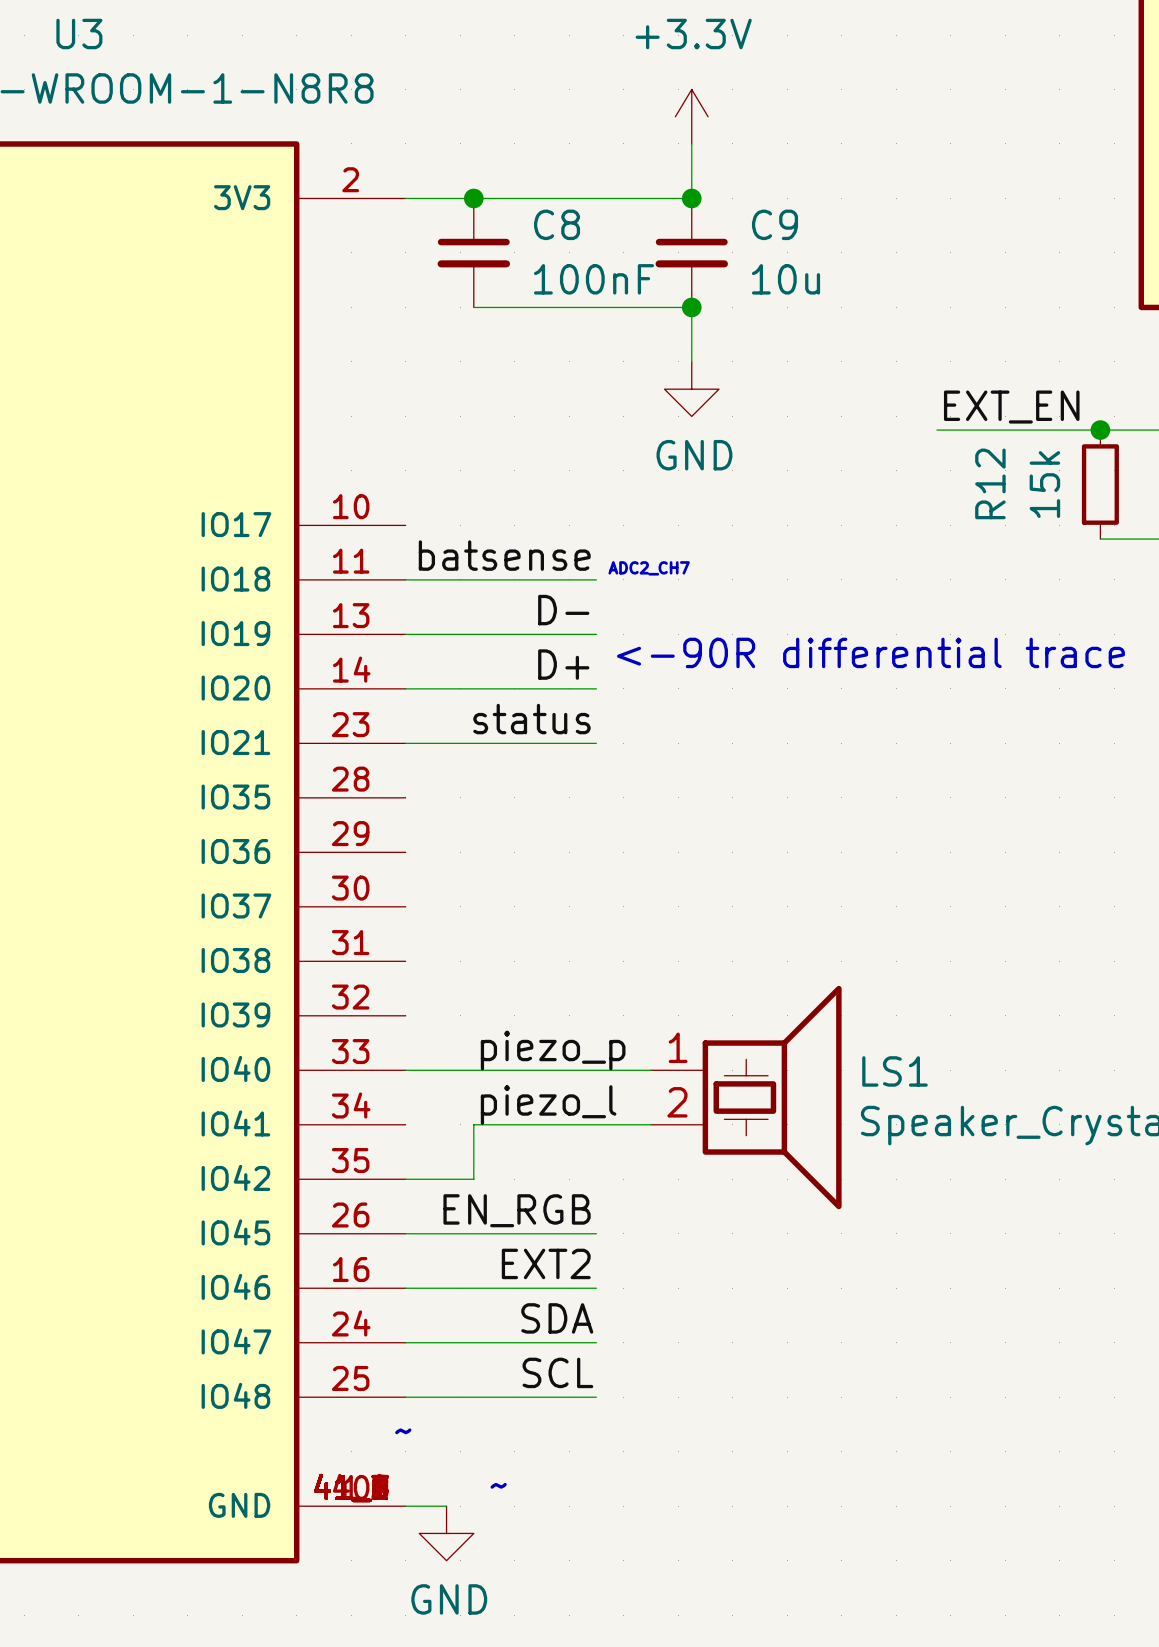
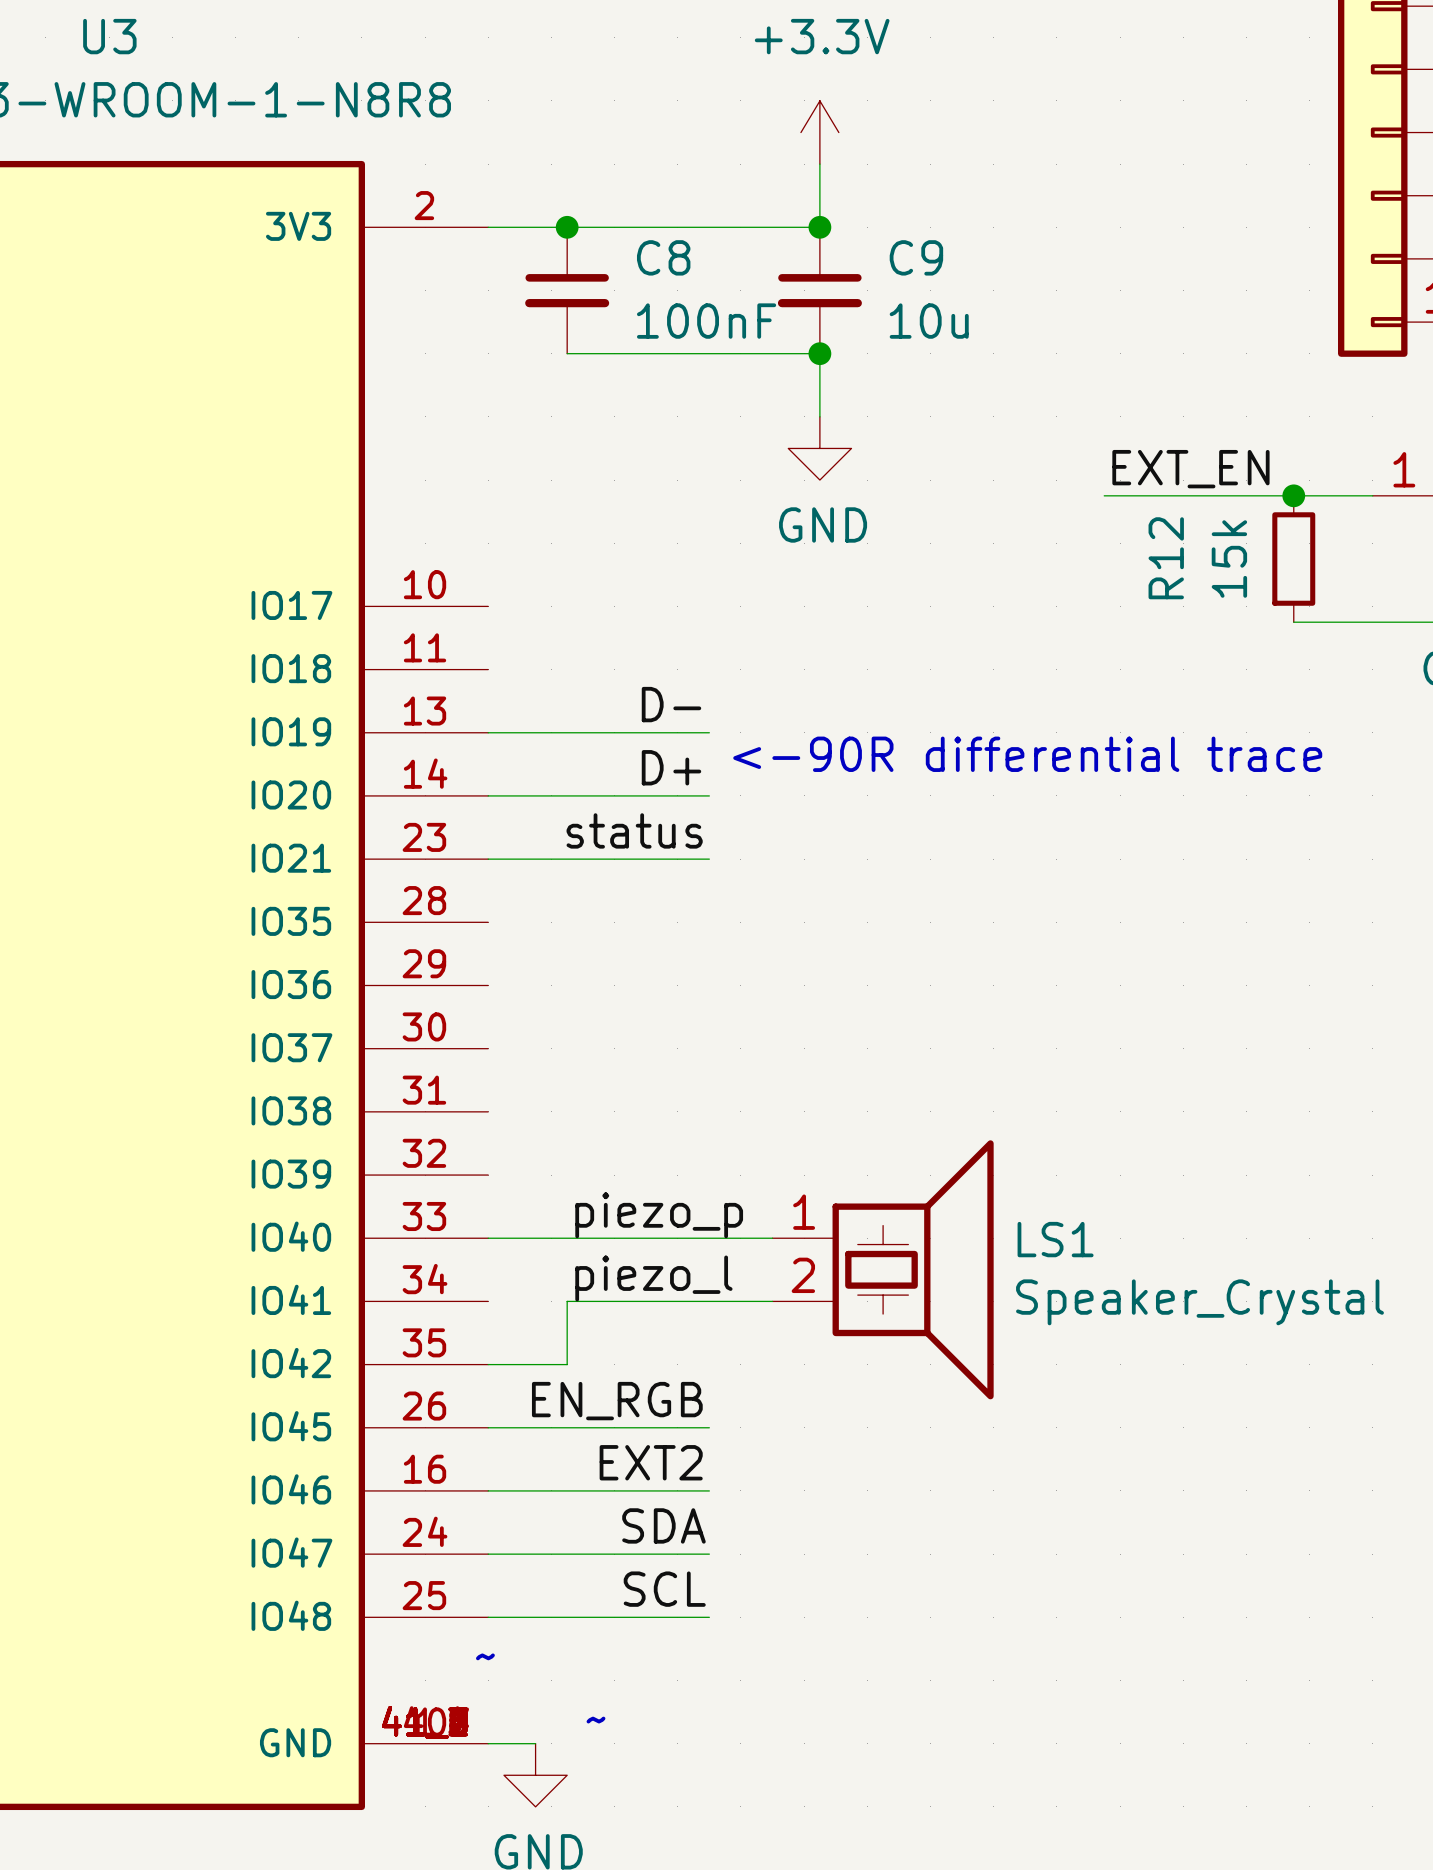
label: batsense (504, 555) -> none
text: ADC2_CH7 (649, 568) -> none
wire: (405, 579) (596, 579) -> none

